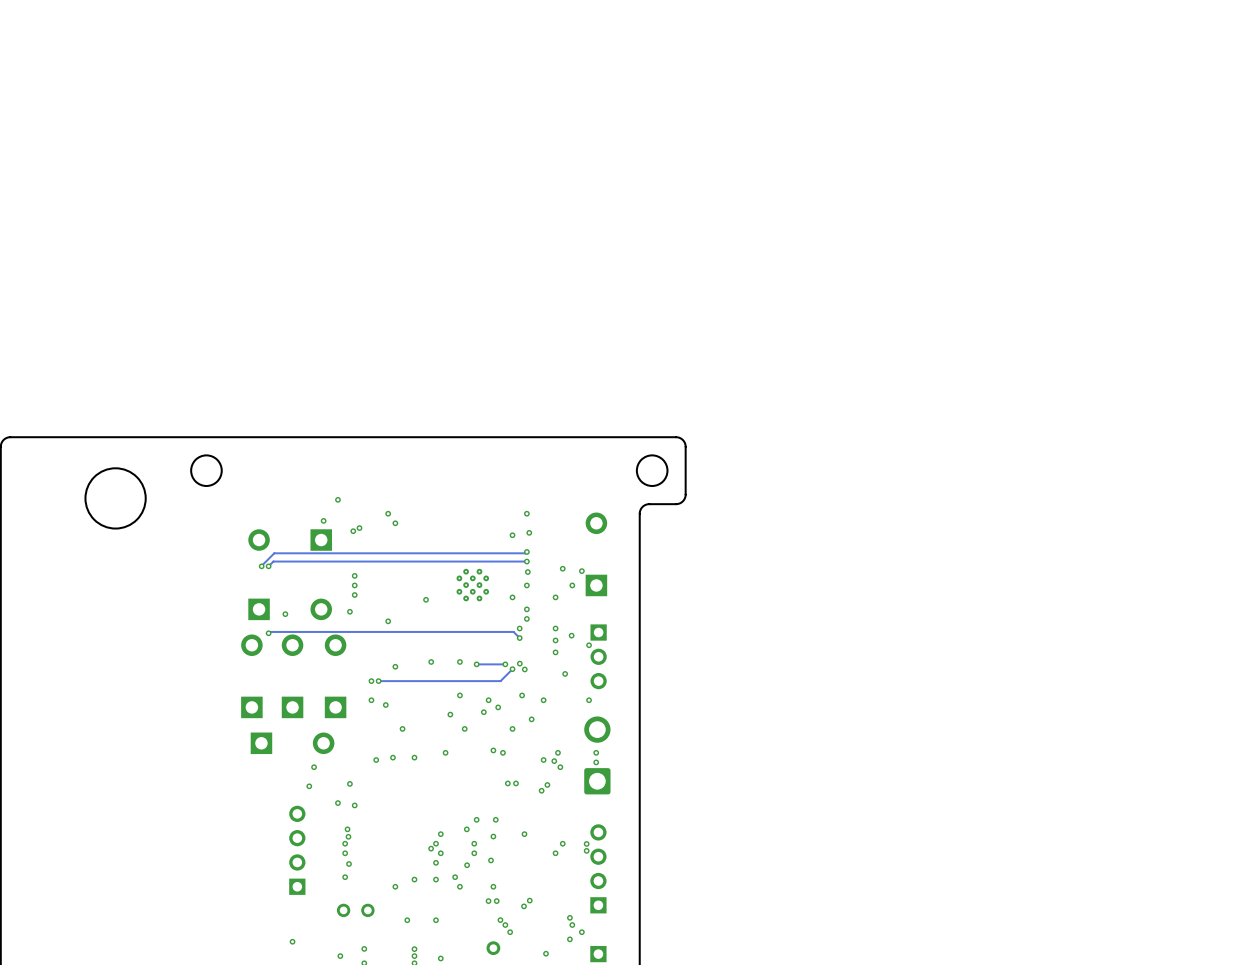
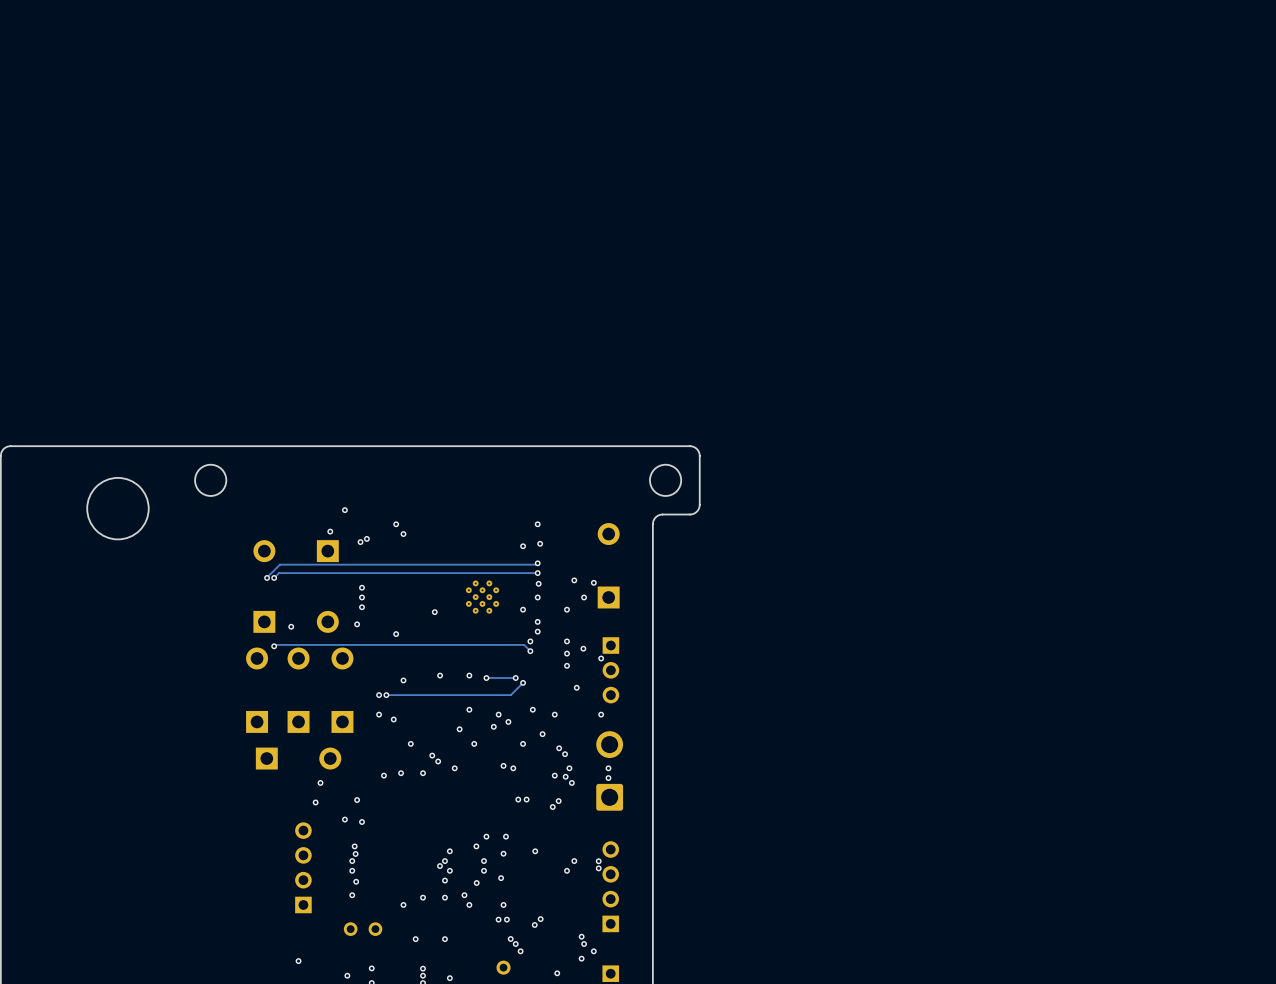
via: (519, 663) -> none
via: (524, 669) -> none
via: none -> (559, 748)
via: none -> (565, 754)
via: none -> (432, 755)
via: none -> (438, 761)

